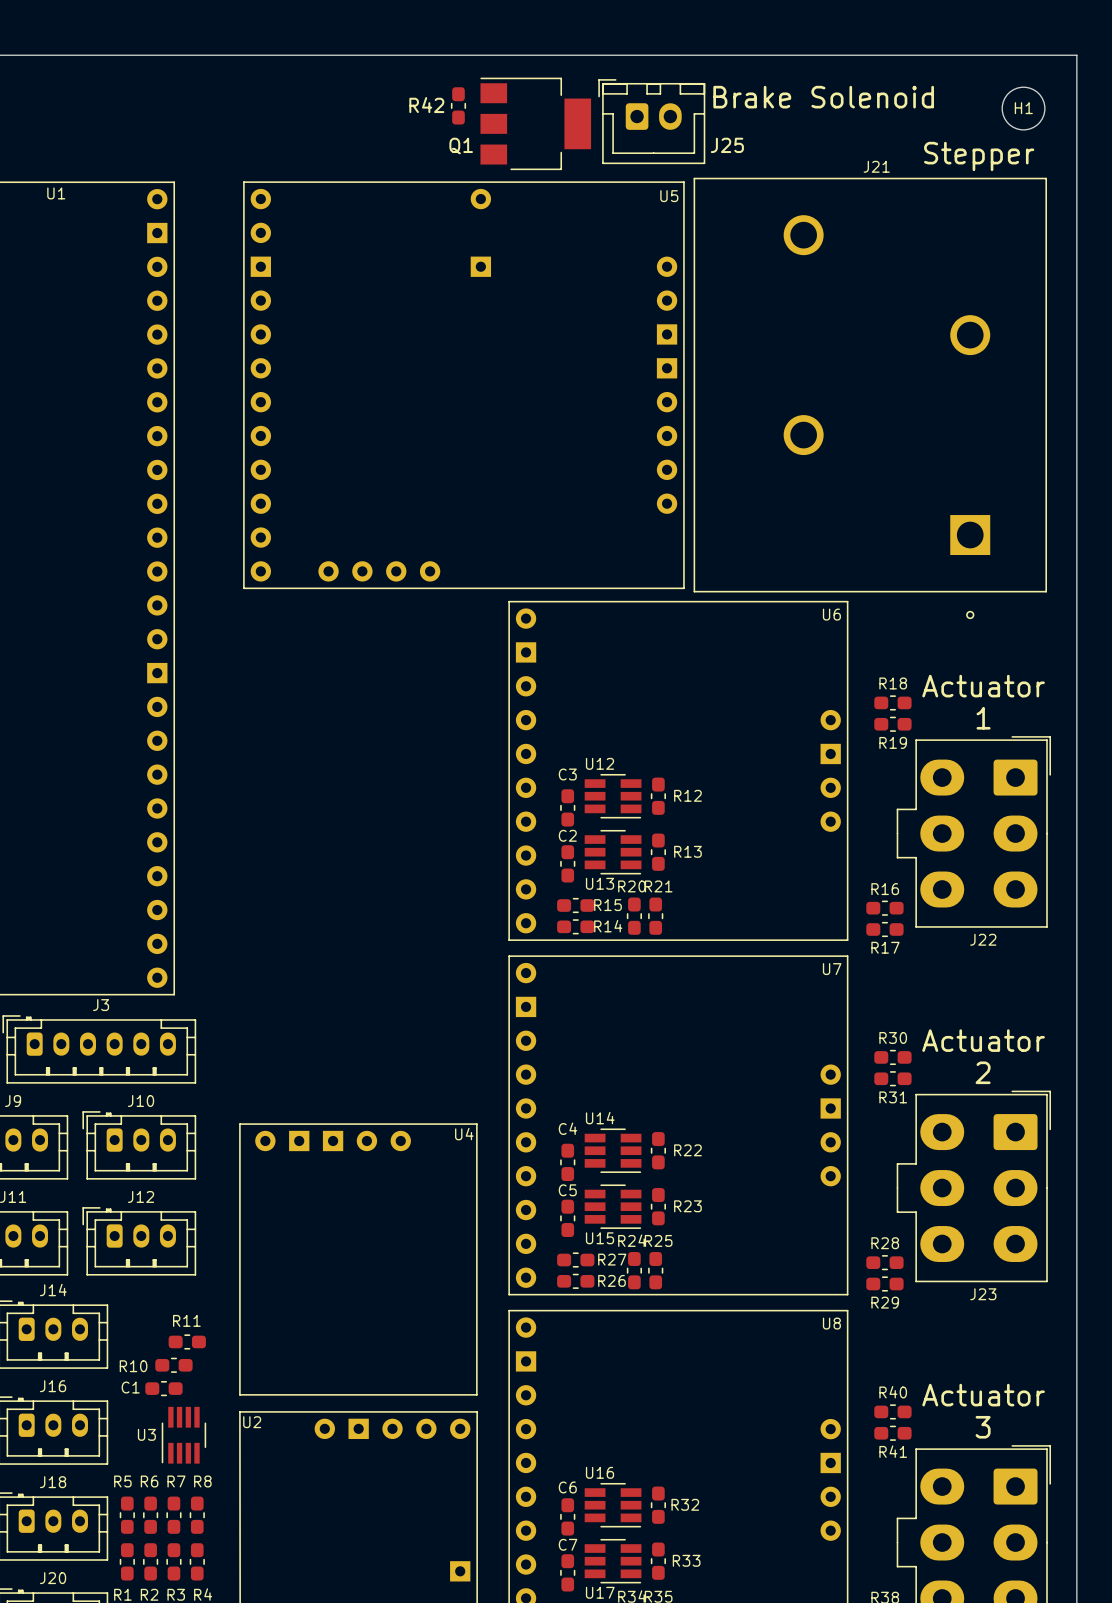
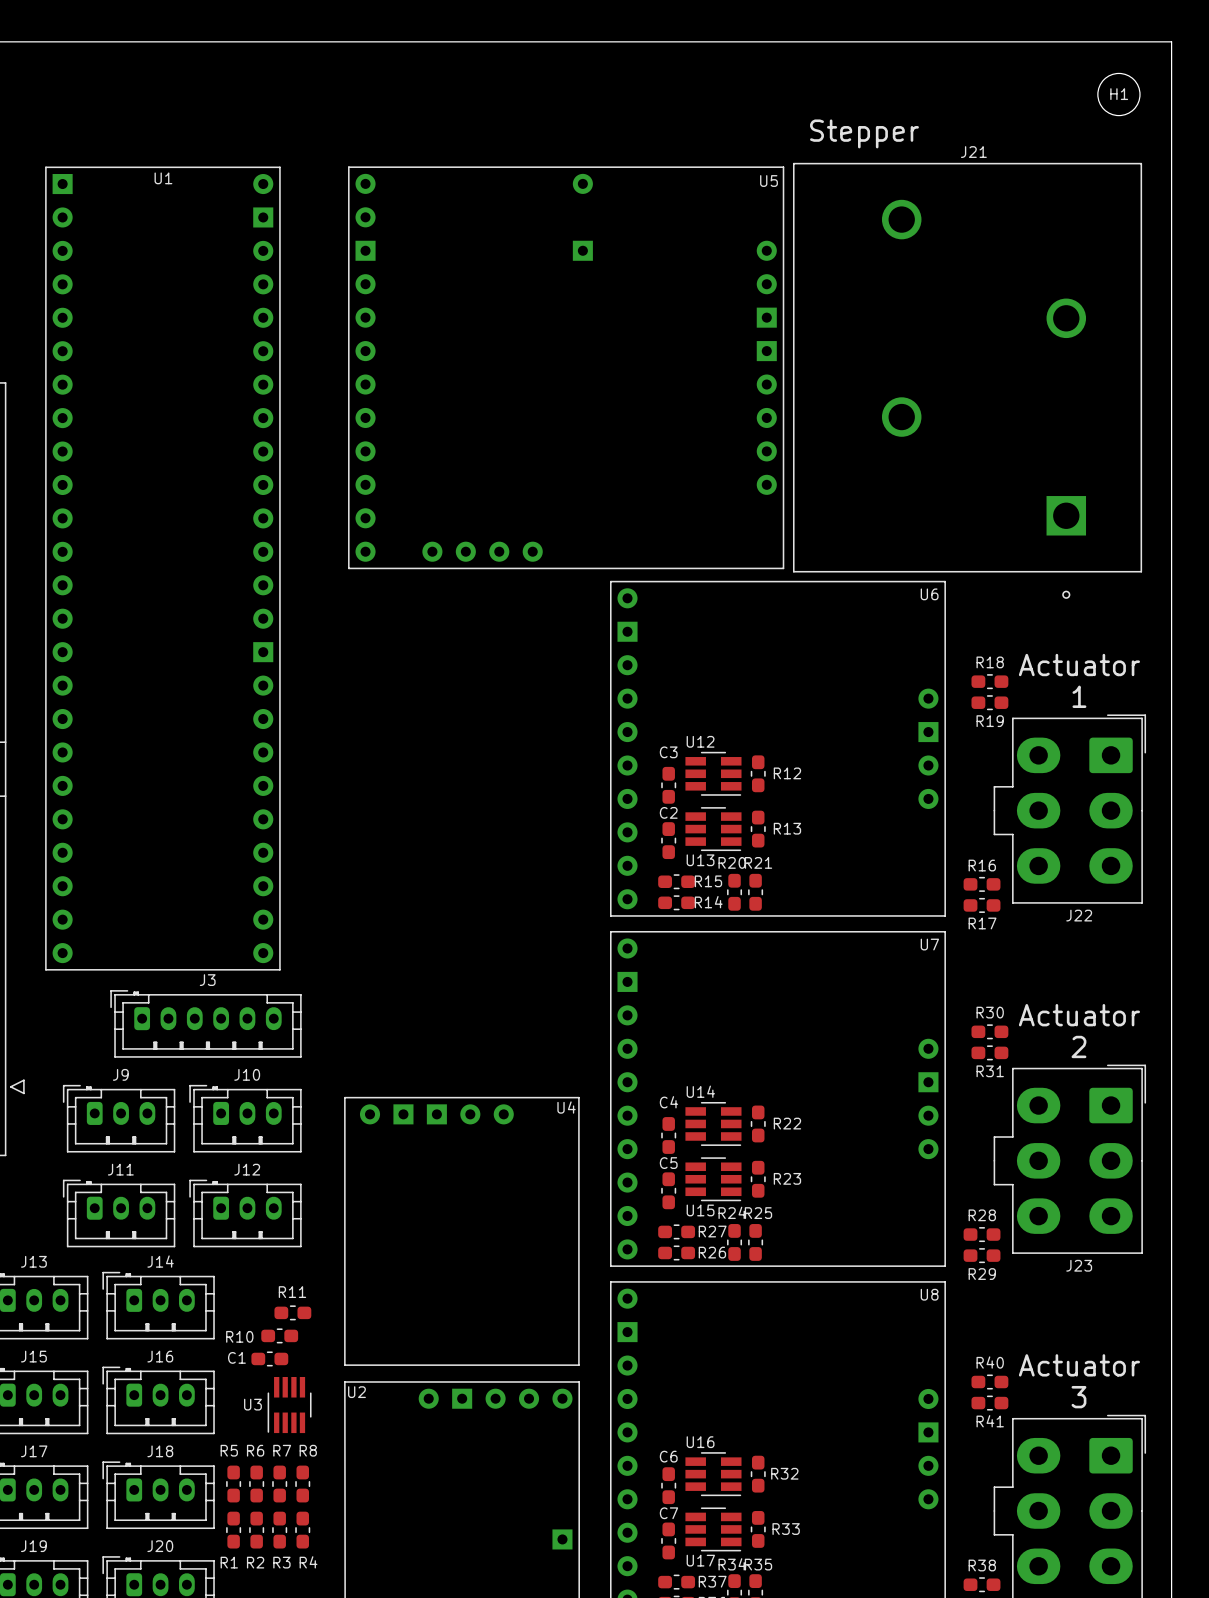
text: Brake Solenoid (823, 97) -> none
R42: (458, 105) -> none
J25: (651, 121) -> none
Q1: (535, 123) -> none
text position: Stepper (979, 156) -> Stepper (864, 133)

